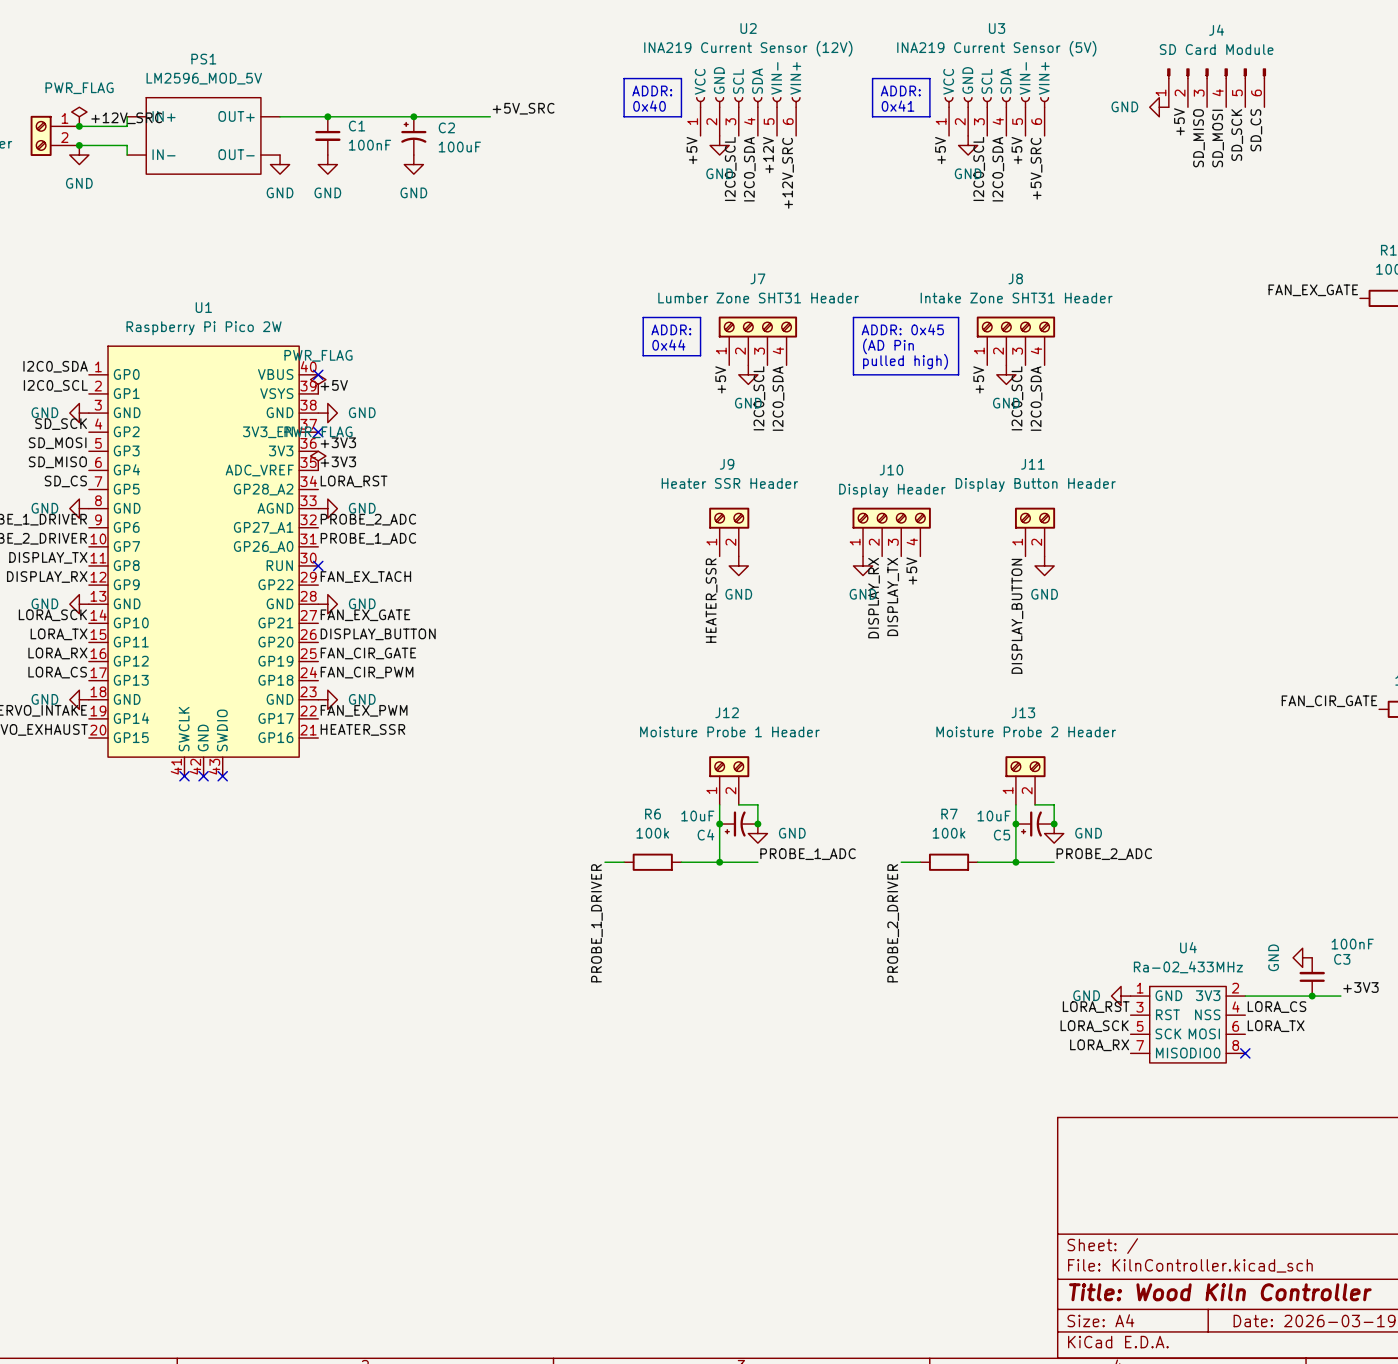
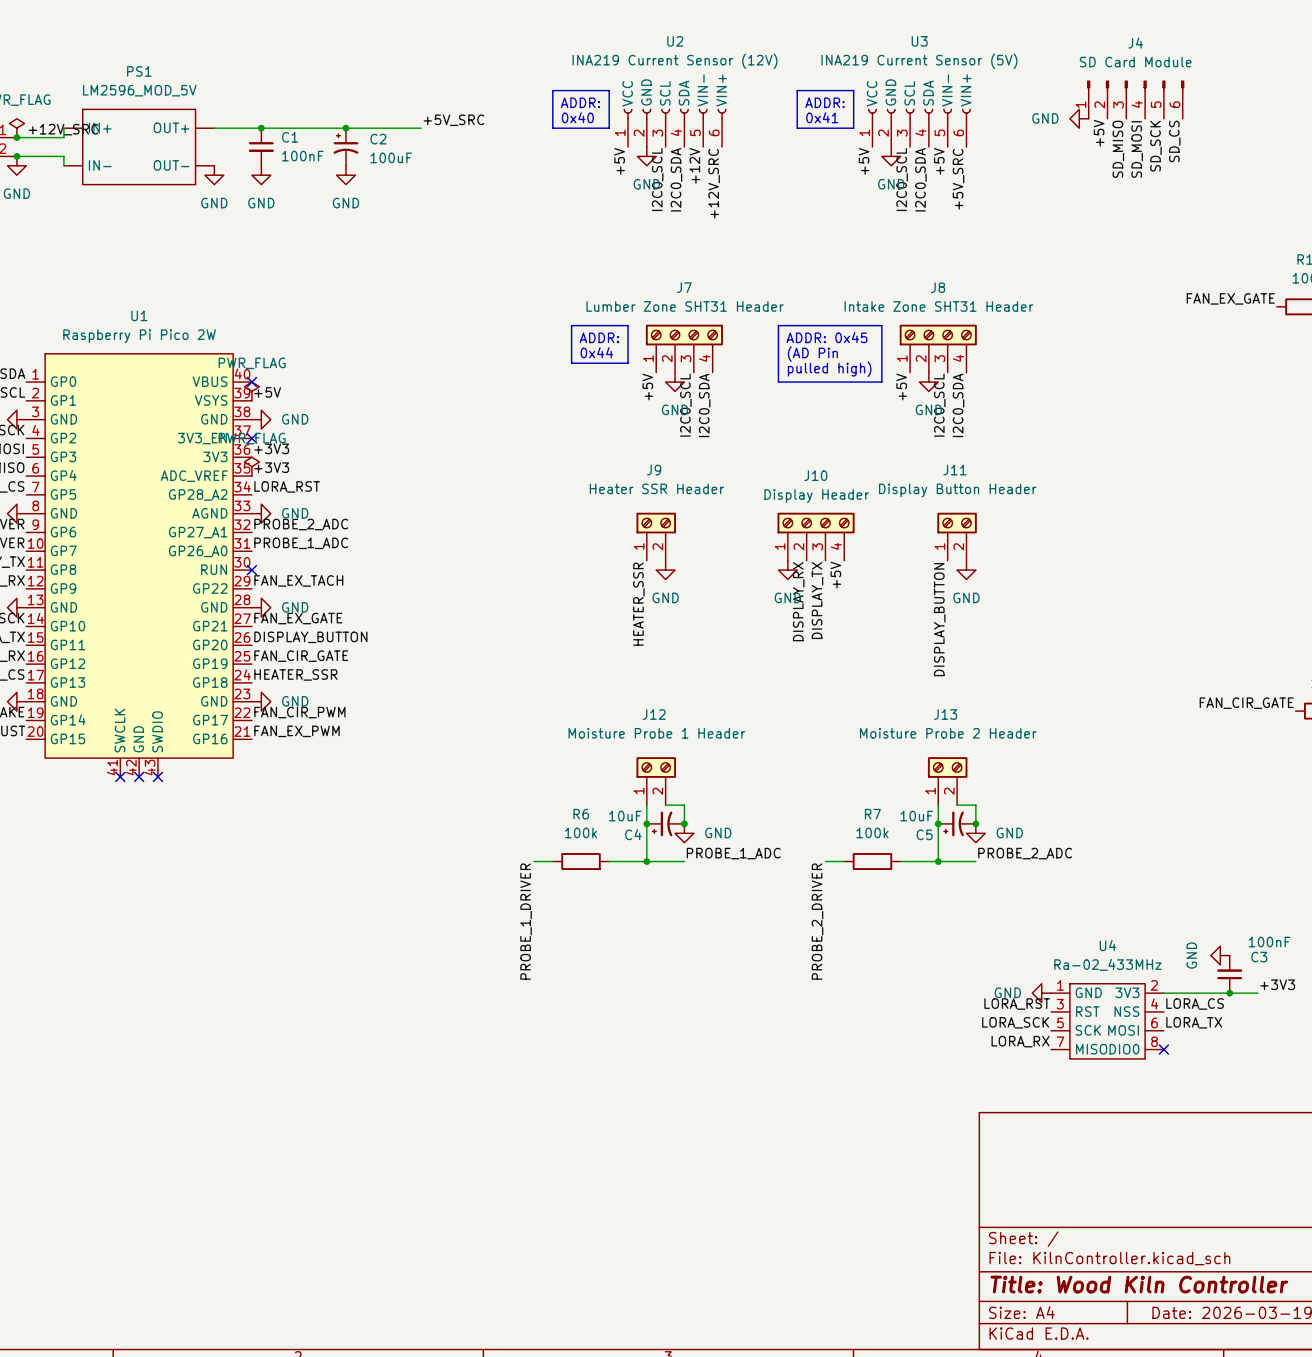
label: FAN_CIR_PWM (367, 672) -> HEATER_SSR (295, 674)
label: FAN_EX_PWM (364, 710) -> FAN_CIR_PWM (299, 712)
label: HEATER_SSR (362, 729) -> FAN_EX_PWM (297, 731)

